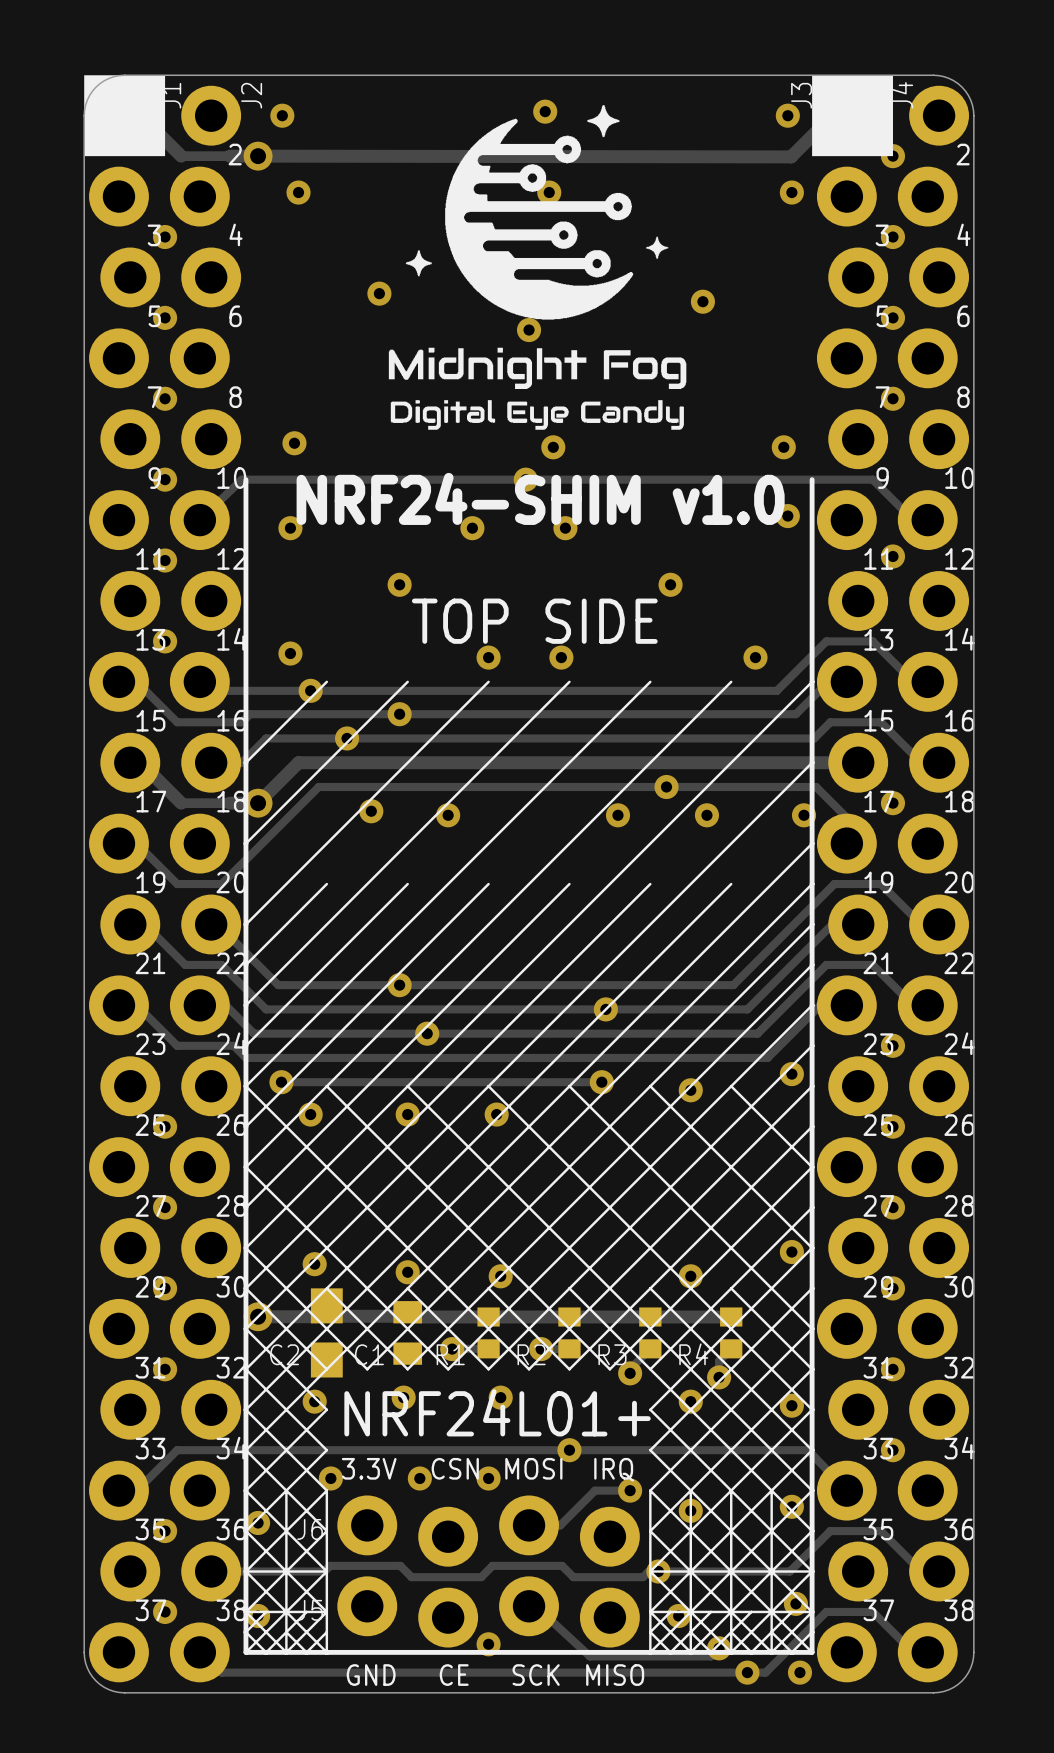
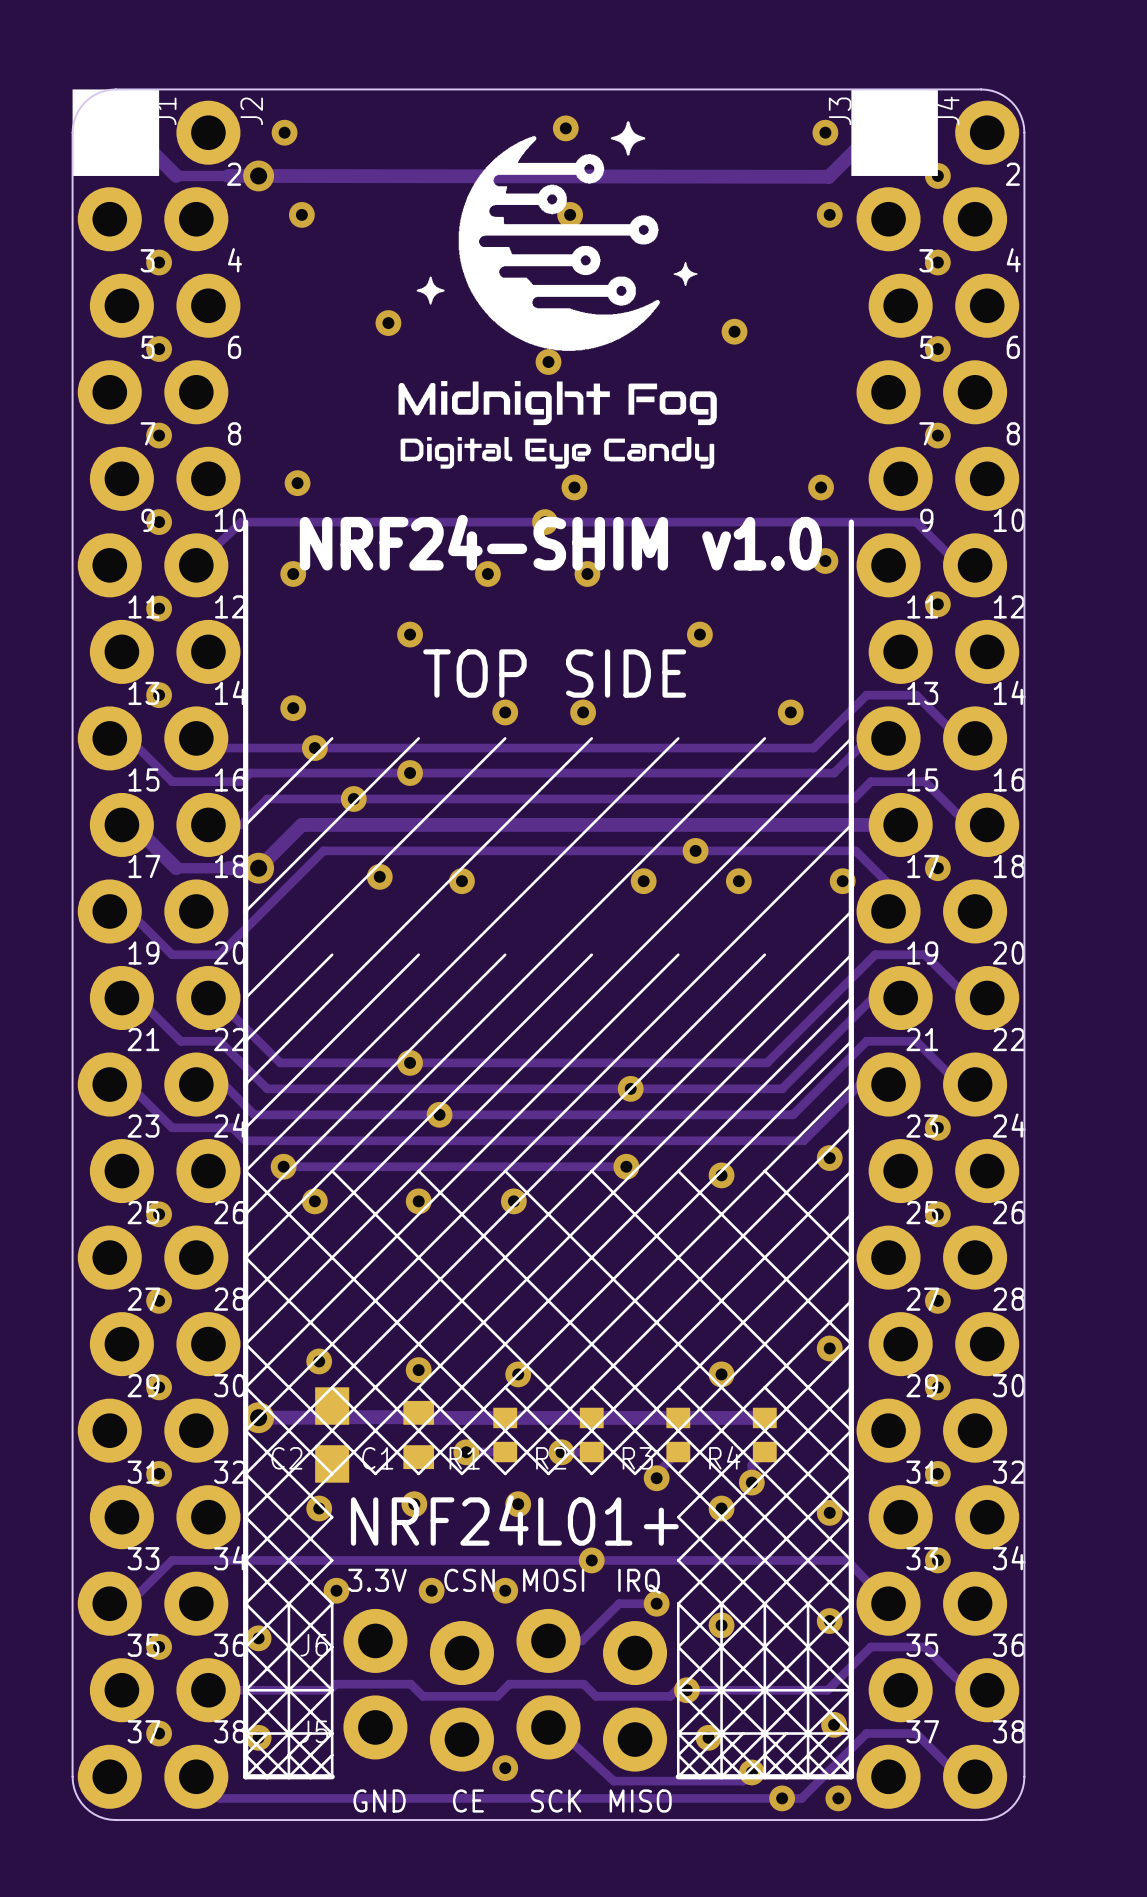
line: (326, 1652) (650, 1652) -> none

